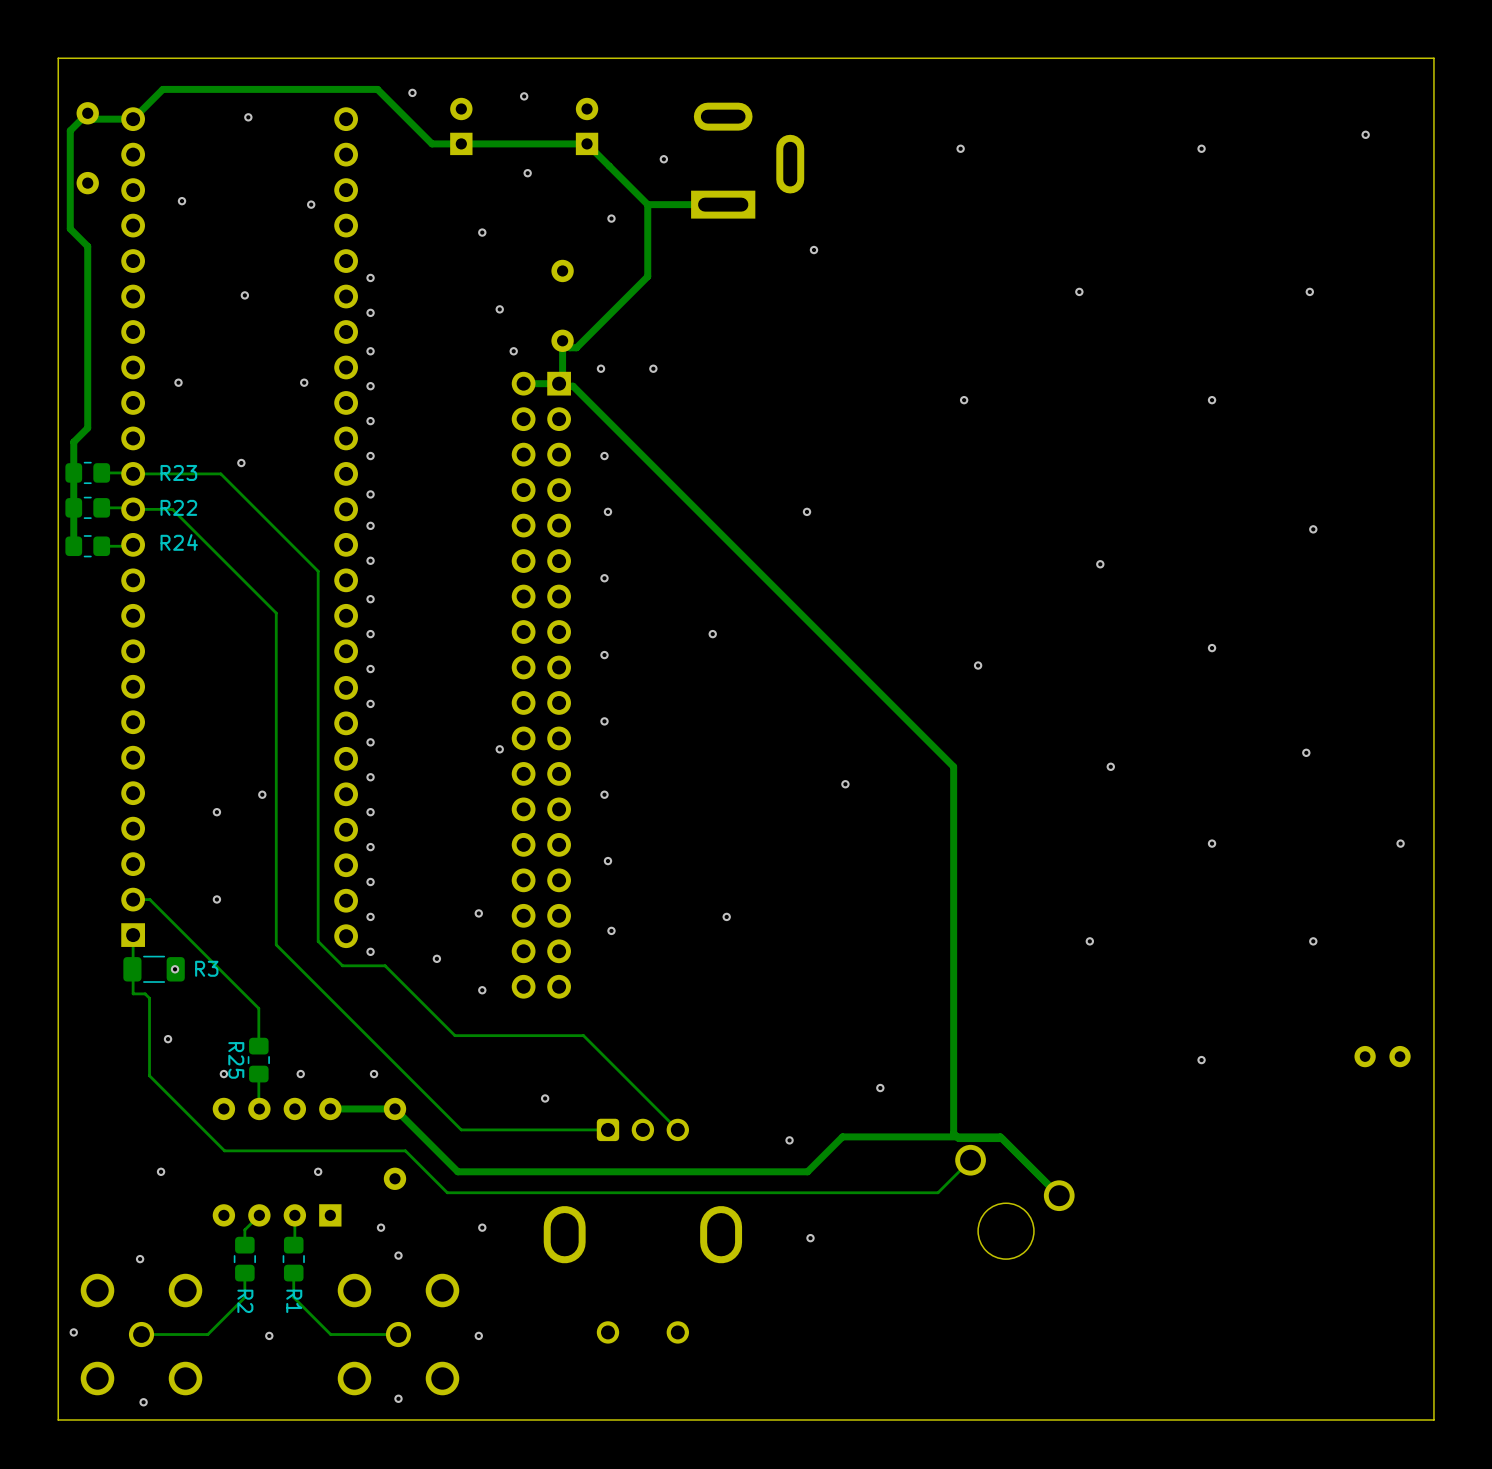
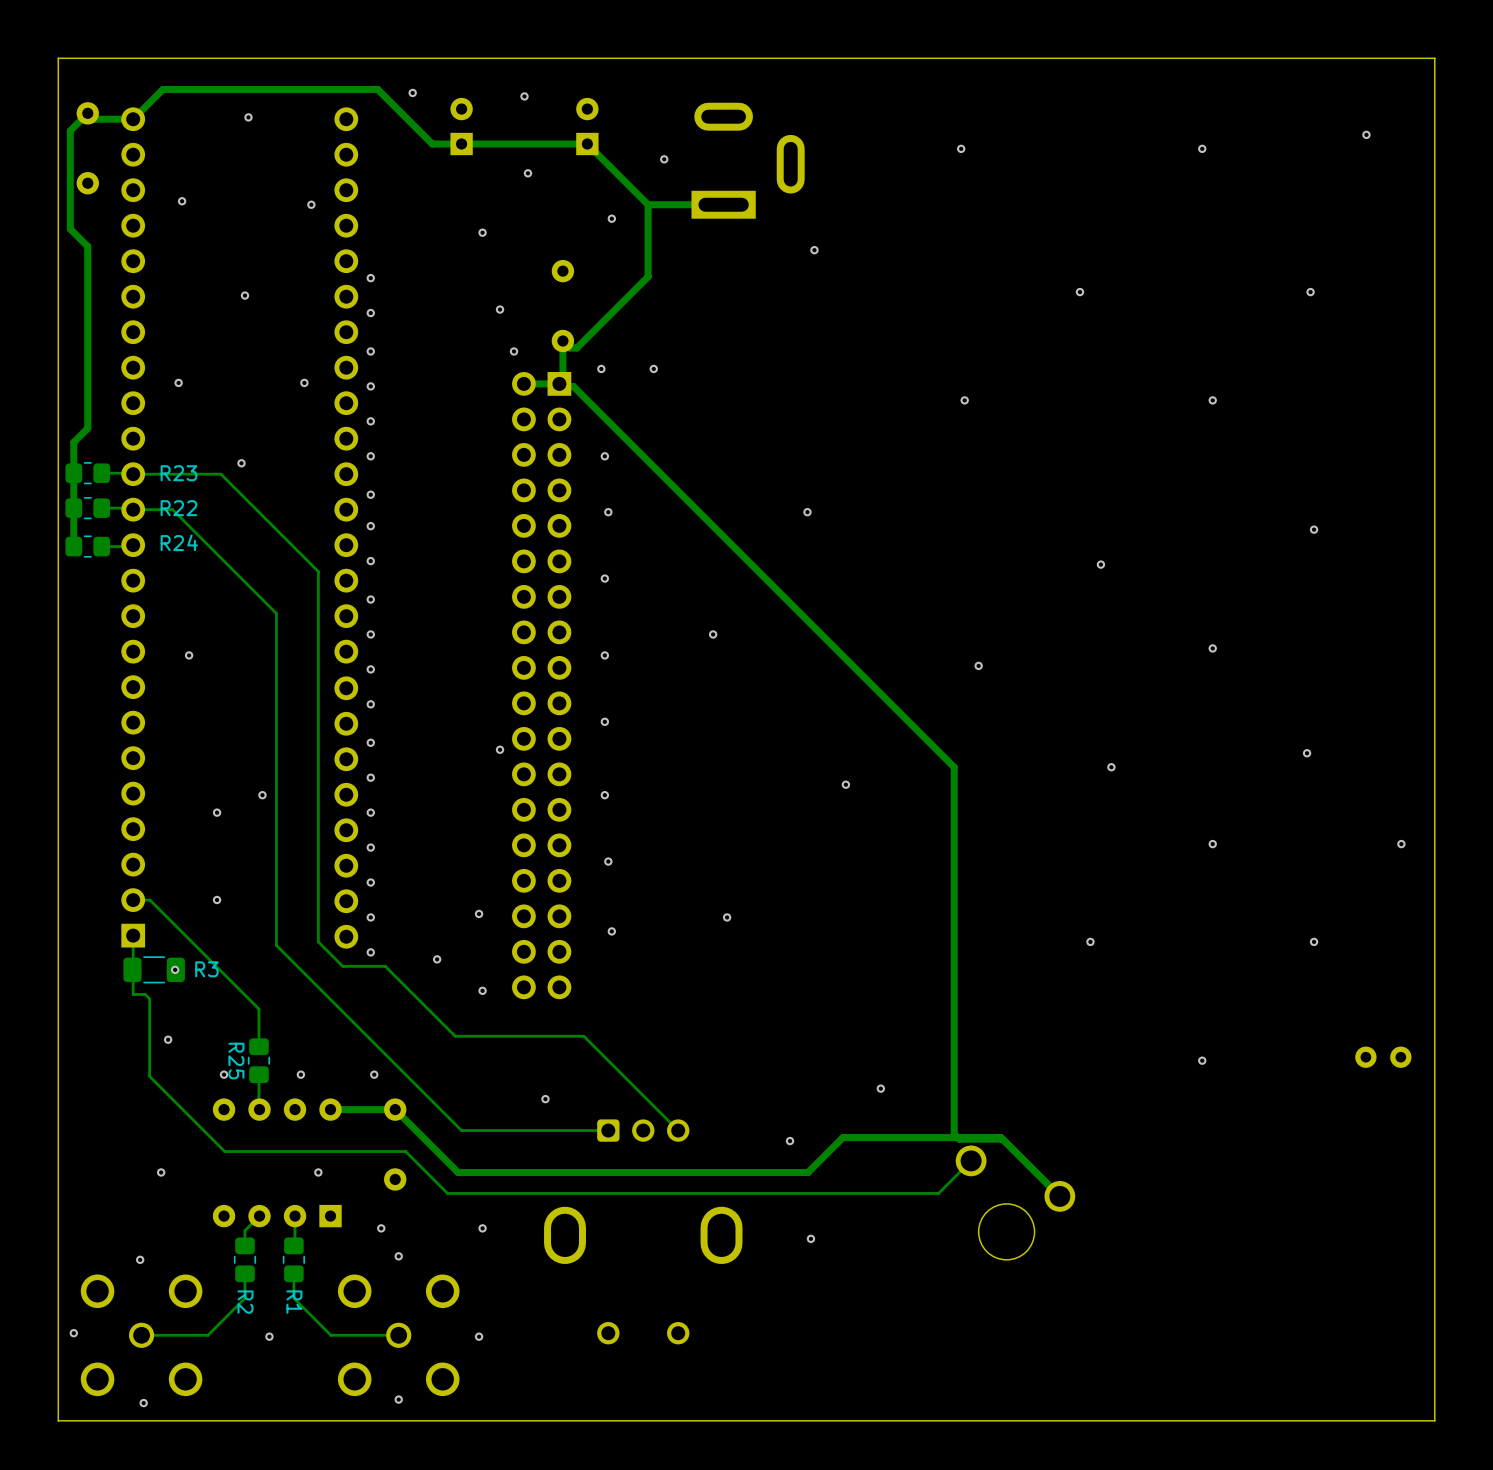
via: none -> (189, 655)

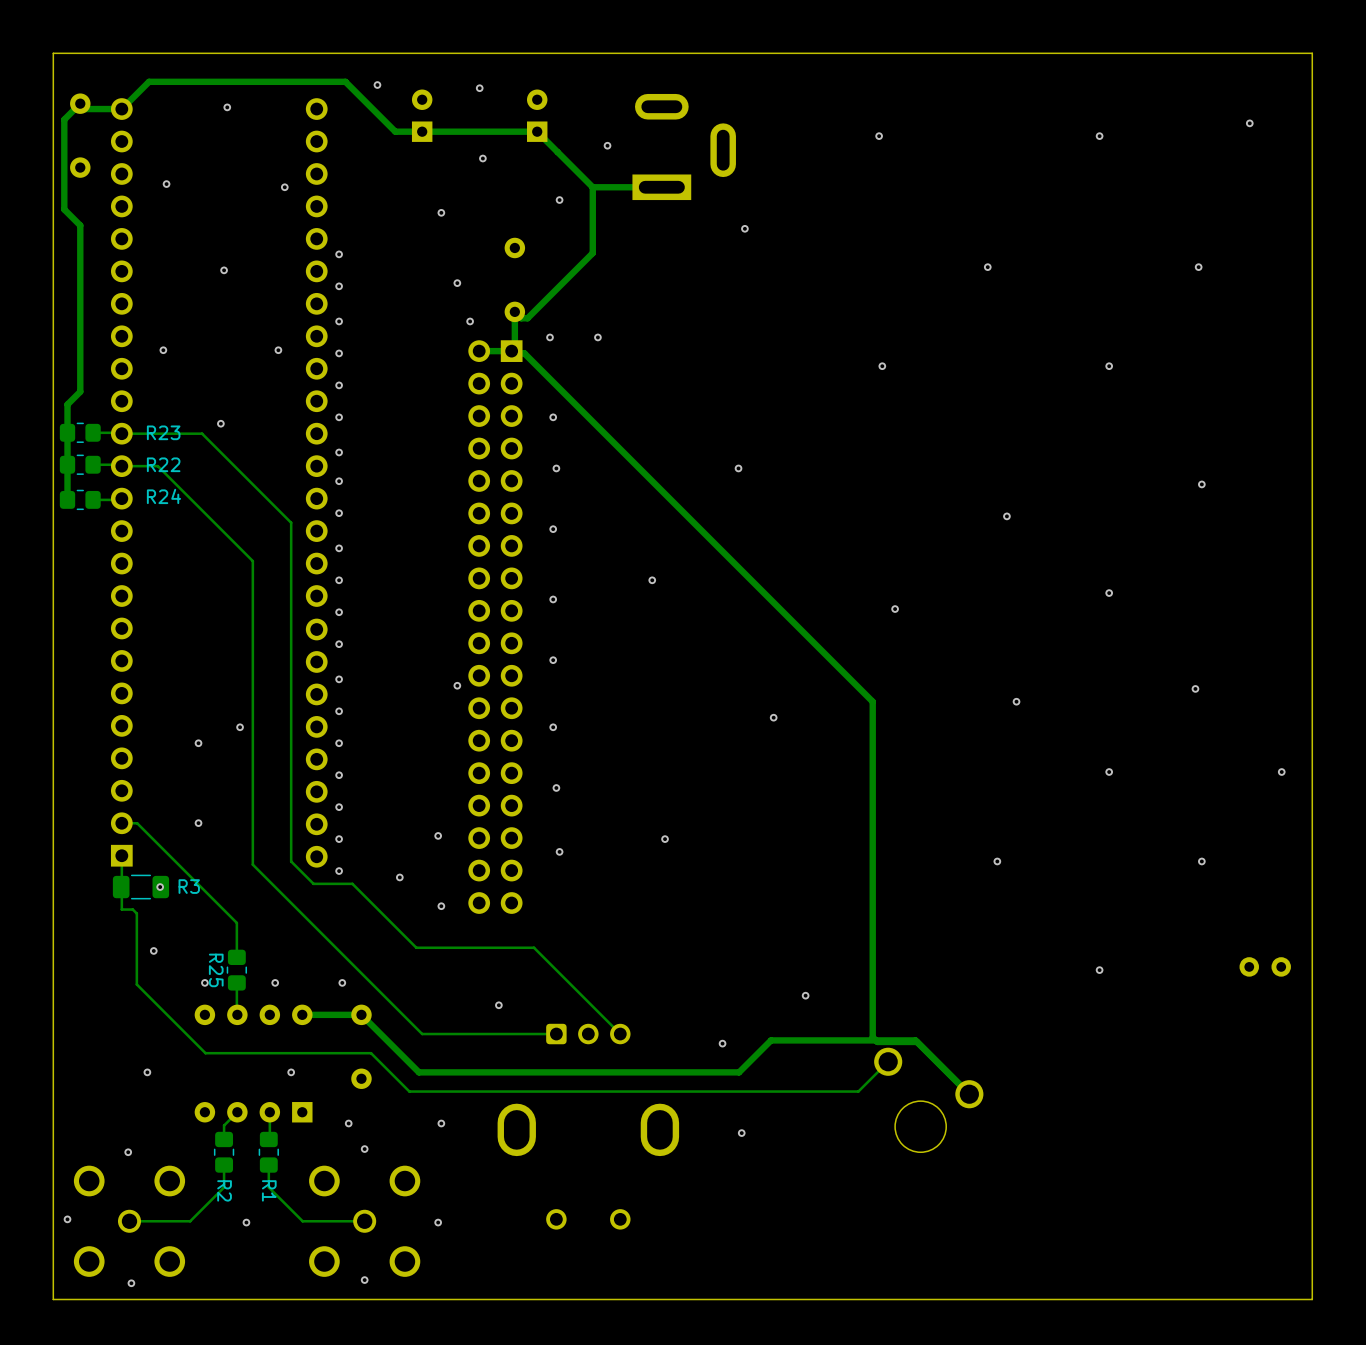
via: (189, 655) -> none

